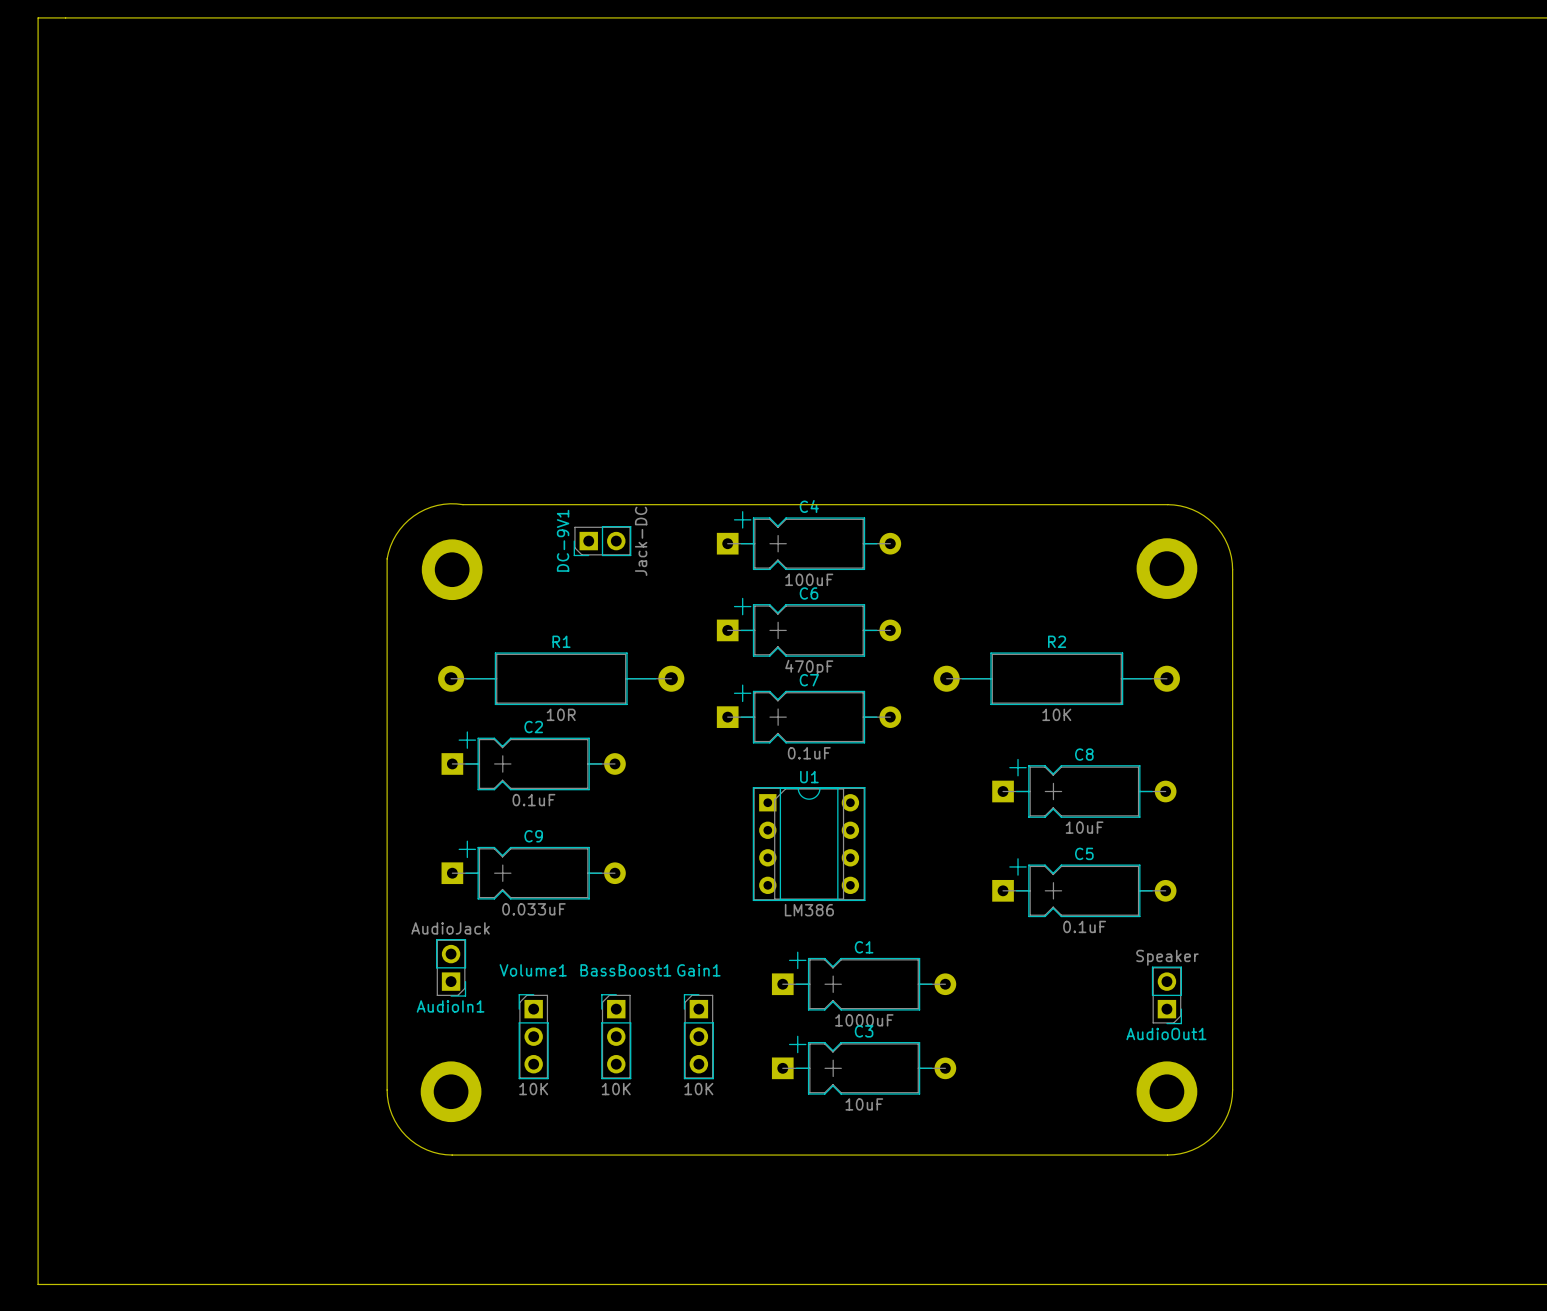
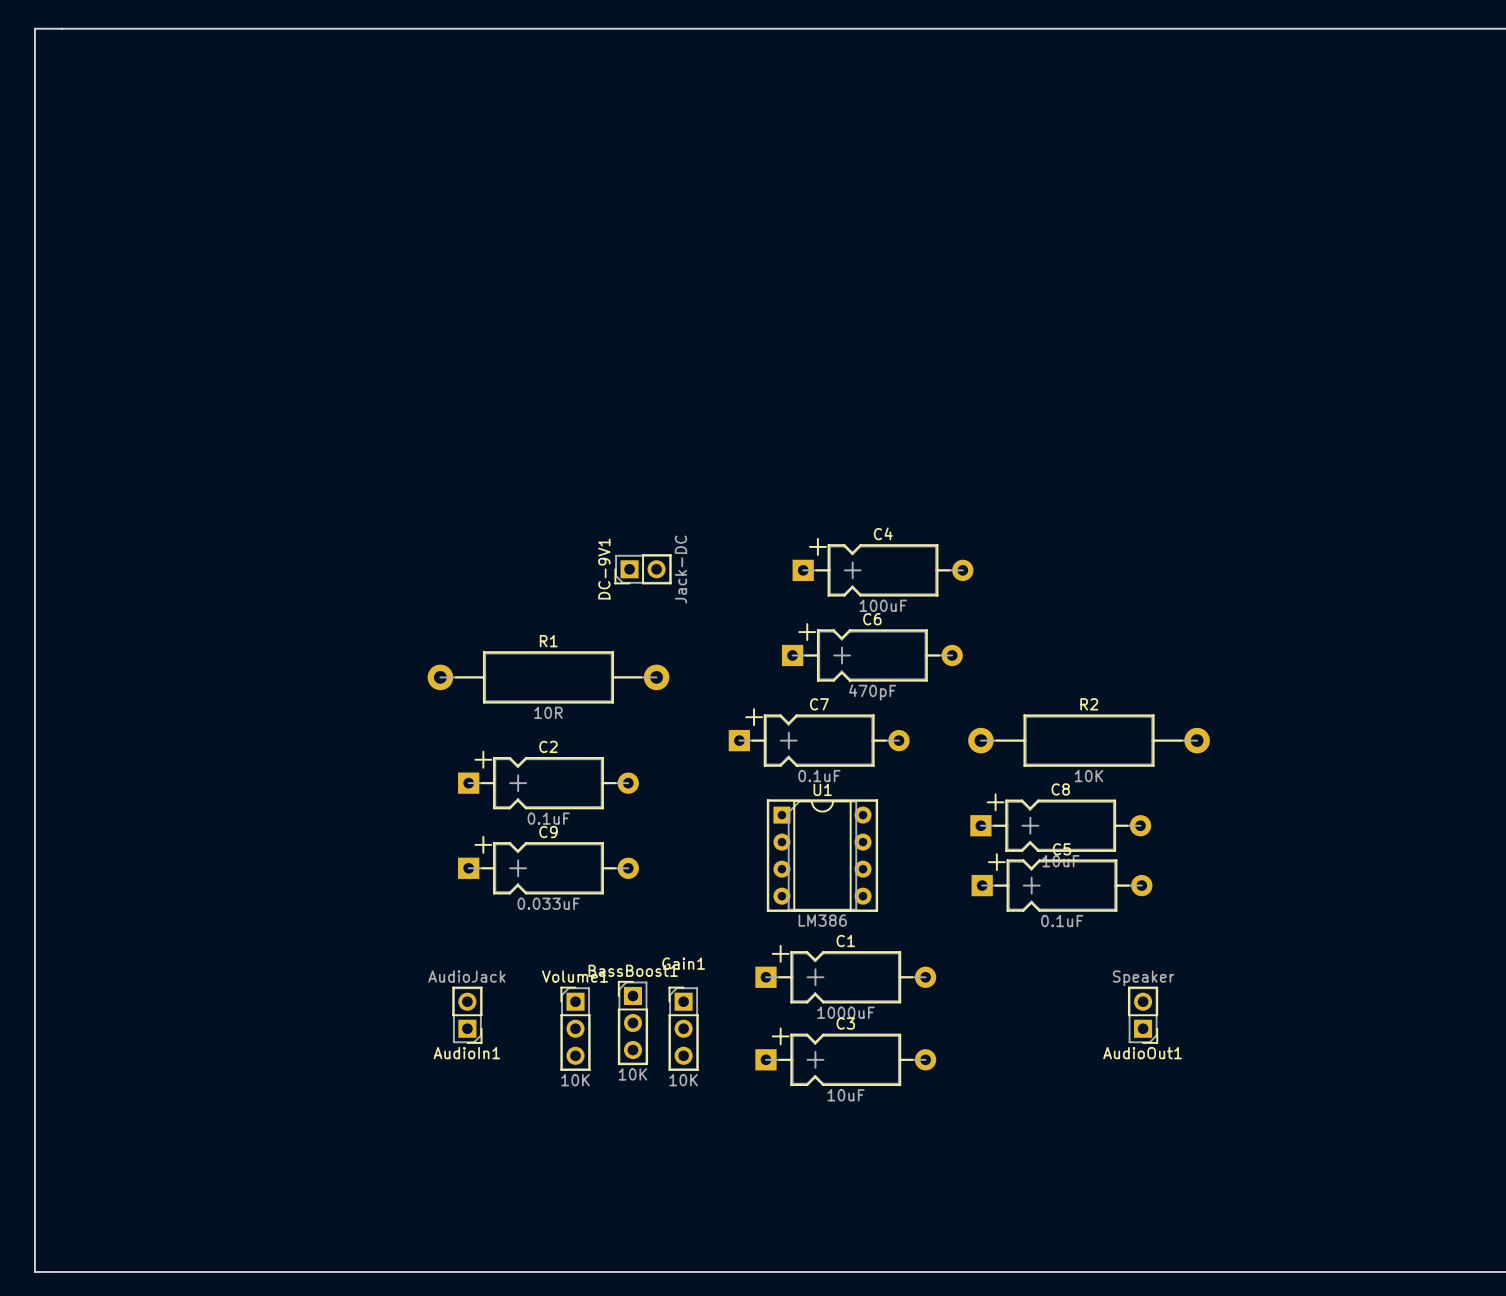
board edge: (463, 504) (1167, 504) (1192, 509) (1208, 519) (1224, 539) (1229, 550) (1232, 569) (1232, 1090) (1227, 1114) (1217, 1131) (1208, 1140) (1192, 1150) (1167, 1155) (452, 1155) (433, 1152) (410, 1140) (401, 1131) (392, 1114) (387, 1090) (387, 558) (396, 534) (413, 516) (437, 505) (463, 504) -> none
C4 position: (809, 540) -> (883, 567)
DC-9V1 position: (602, 541) -> (643, 569)
part: (1166, 568) -> none
part: (452, 569) -> none
C6 position: (809, 627) -> (872, 652)
R2 position: (1056, 678) -> (1089, 740)
C7 position: (809, 714) -> (819, 737)
C2 position: (533, 760) -> (548, 780)
C8 position: (1084, 788) -> (1060, 822)
U1 position: (809, 844) -> (822, 855)
C9 position: (533, 870) -> (548, 865)
AudioIn1 position: (451, 967) -> (467, 1015)
Volume1 name position: Volume1 (533, 970) -> Volume1 (574, 976)
BassBoost1 name position: BassBoost1 (625, 970) -> BassBoost1 (633, 970)
AudioOut1 position: (1166, 995) -> (1143, 1015)
Volume1 position: (533, 1036) -> (575, 1028)
BassBoost1 position: (616, 1036) -> (632, 1023)
part: (451, 1091) -> none
part: (1166, 1091) -> none

